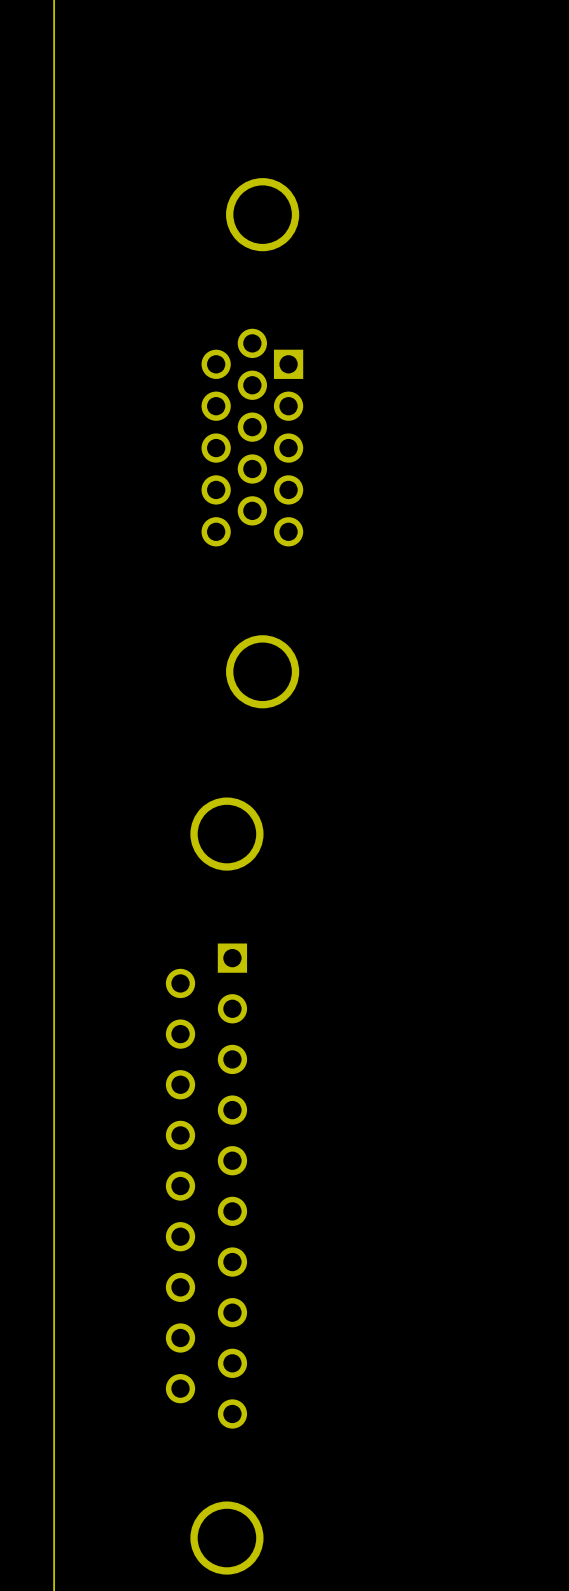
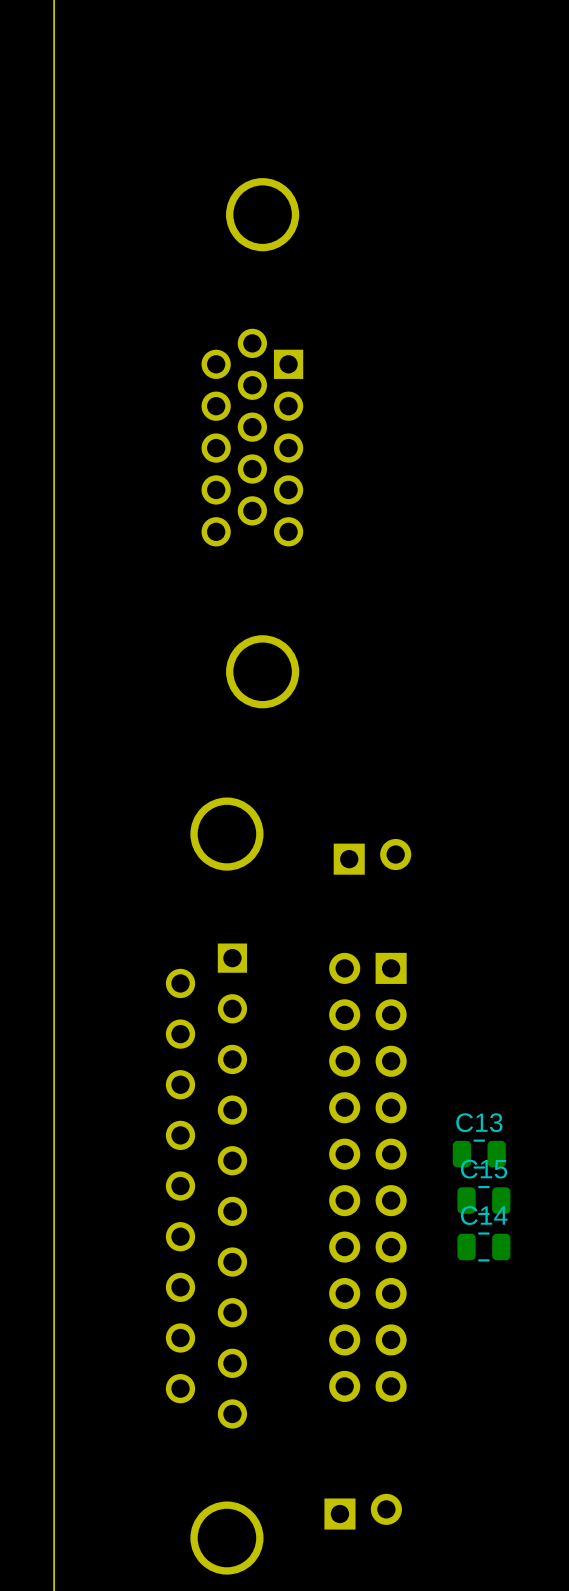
part: none -> (372, 856)
C13: none -> (479, 1154)
part: none -> (367, 1177)
C15: none -> (483, 1200)
C14: none -> (483, 1246)
part: none -> (363, 1511)

